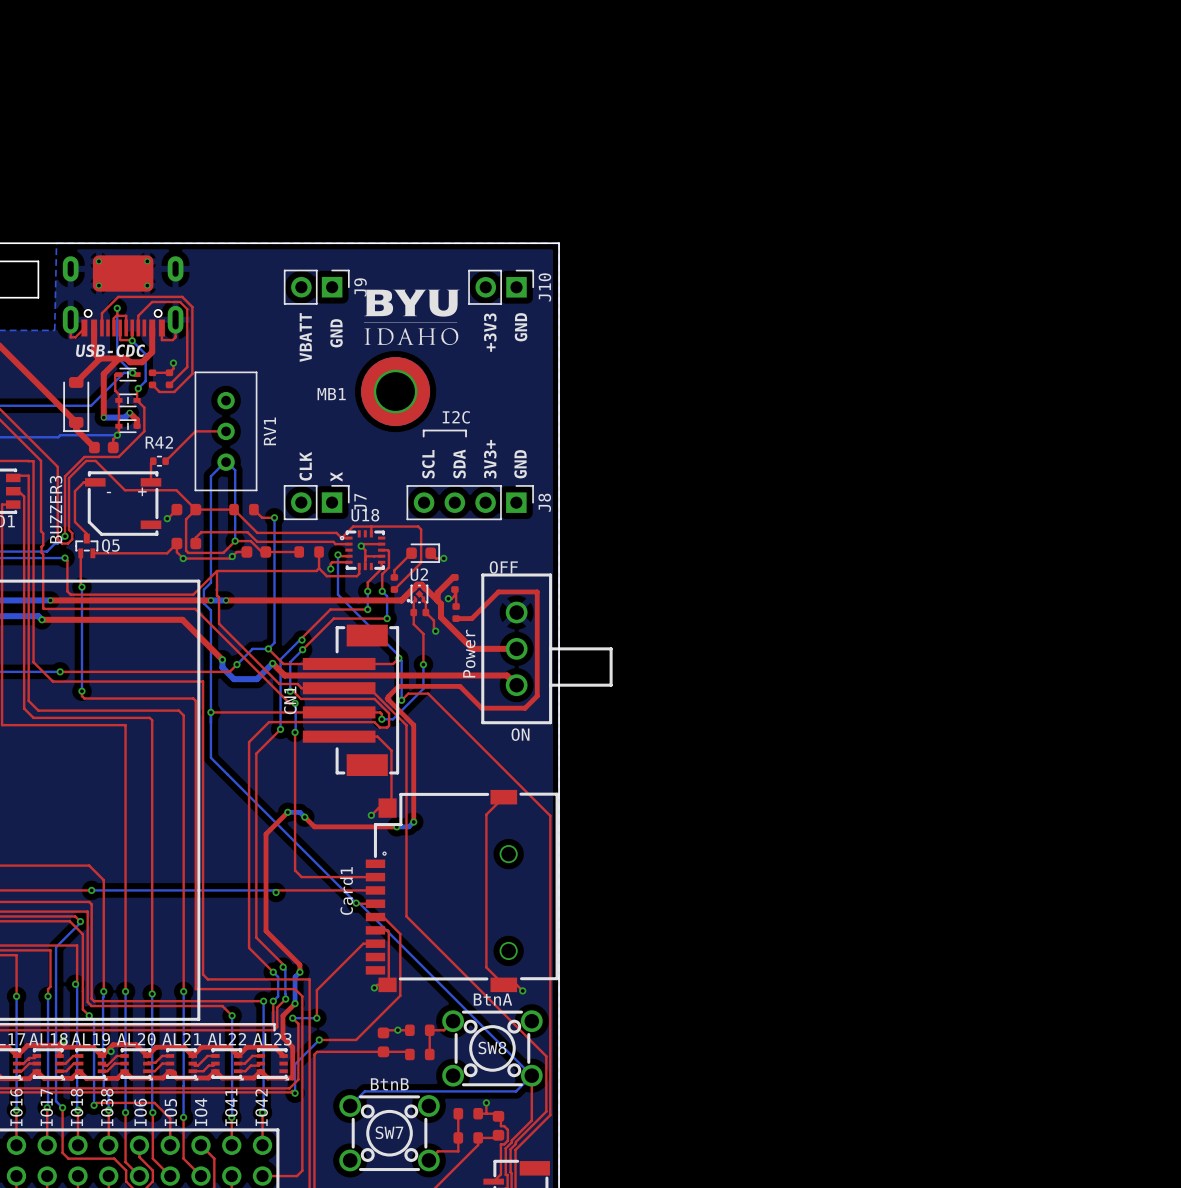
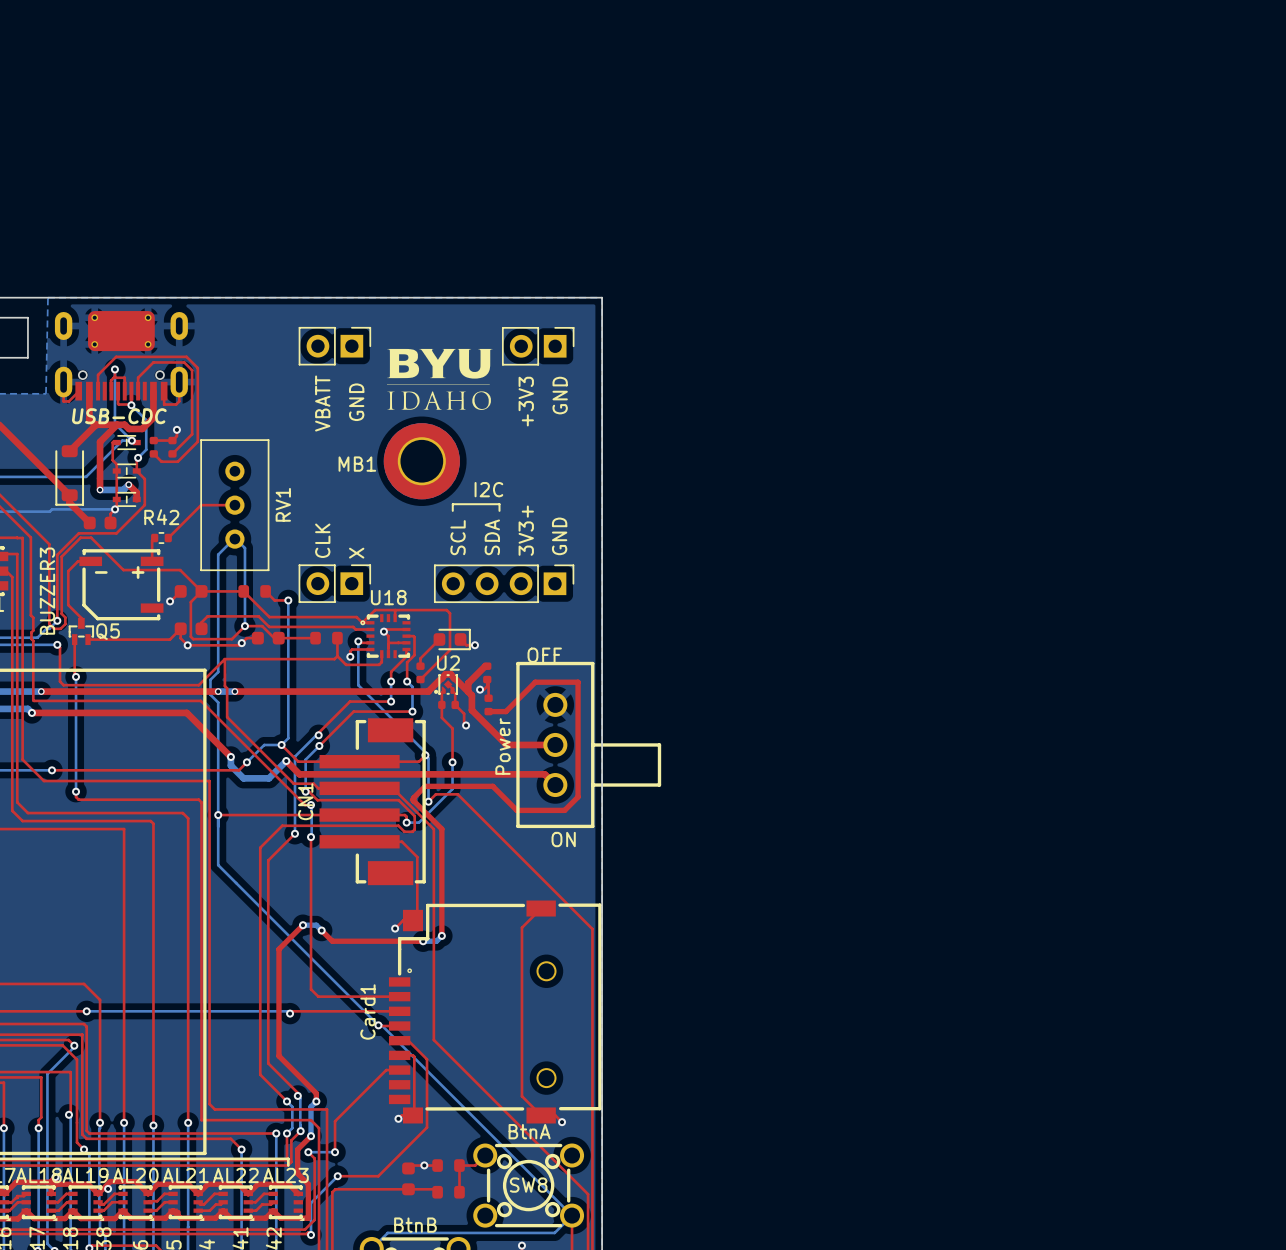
J9 name: J9 (360, 287) -> none
J10 name: J10 (544, 287) -> none
J7 name: J7 (360, 502) -> none
J8 name: J8 (544, 502) -> none

